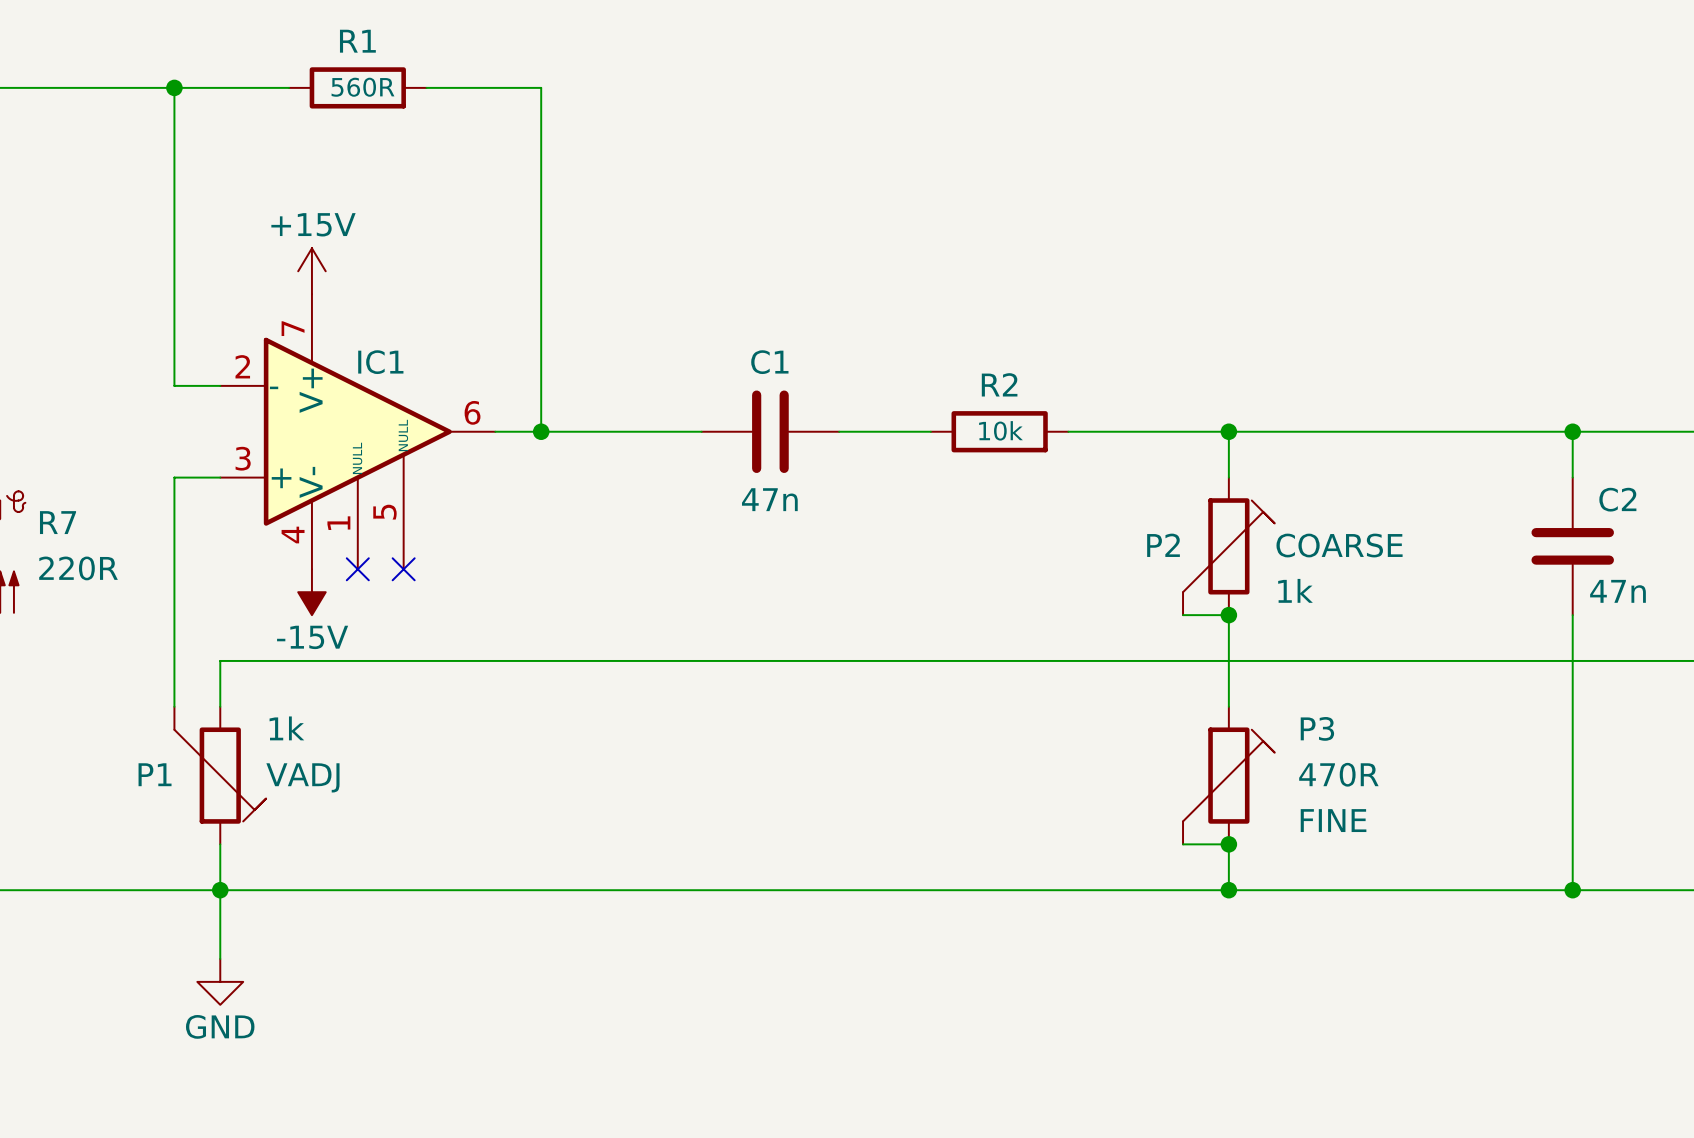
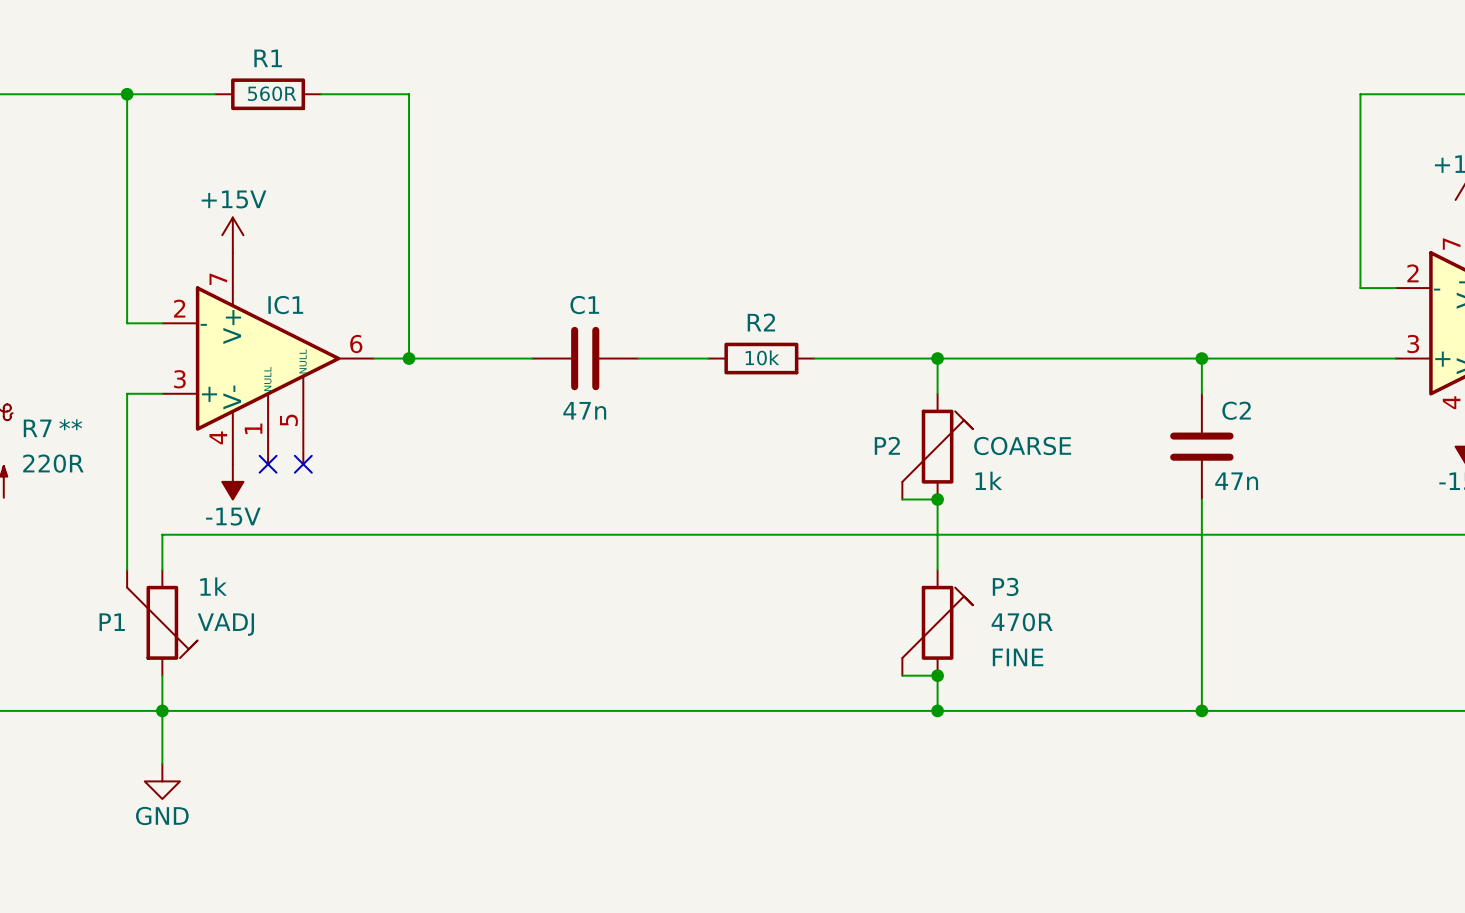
R7 text: none -> ** (70, 424)

